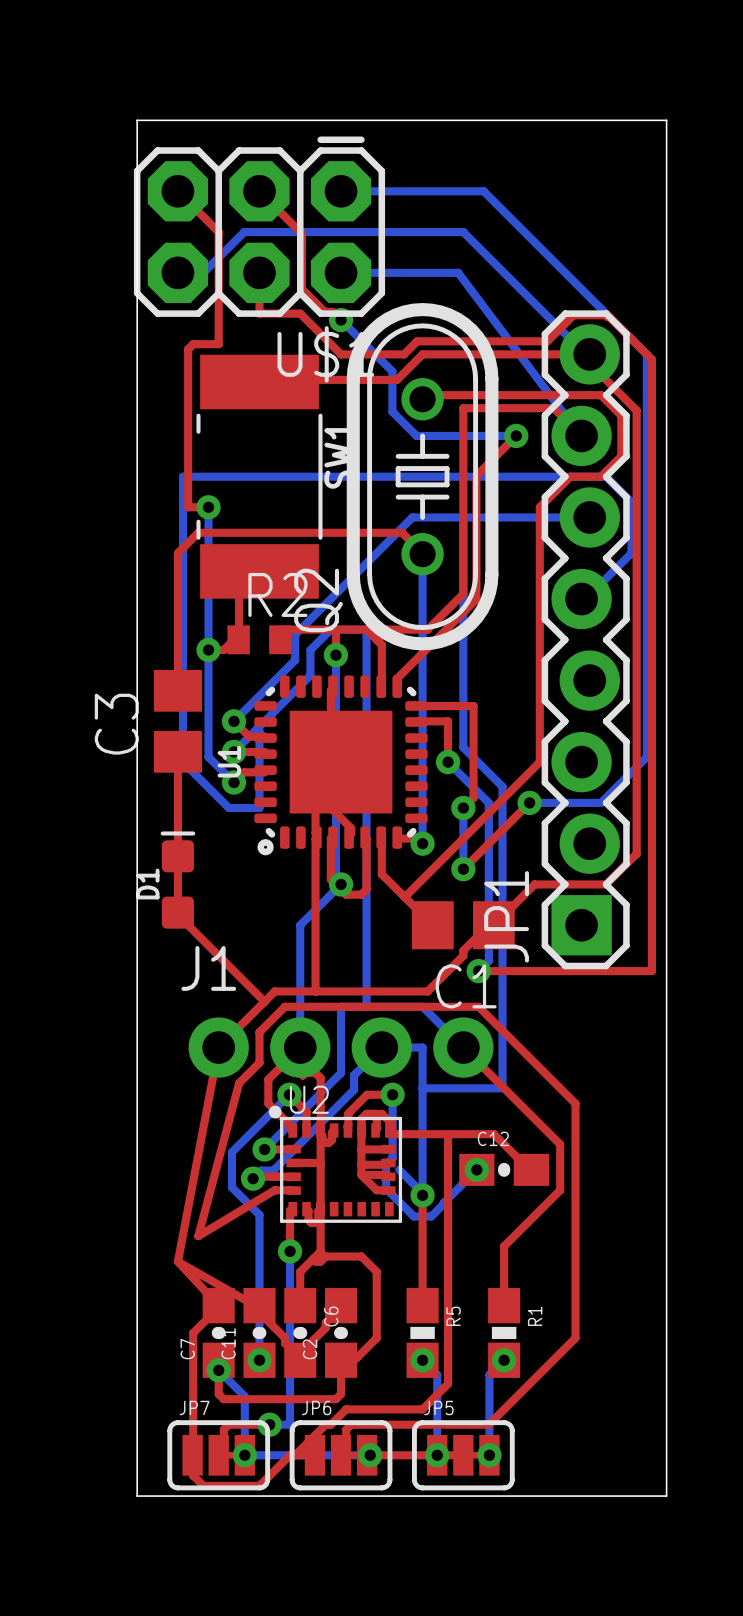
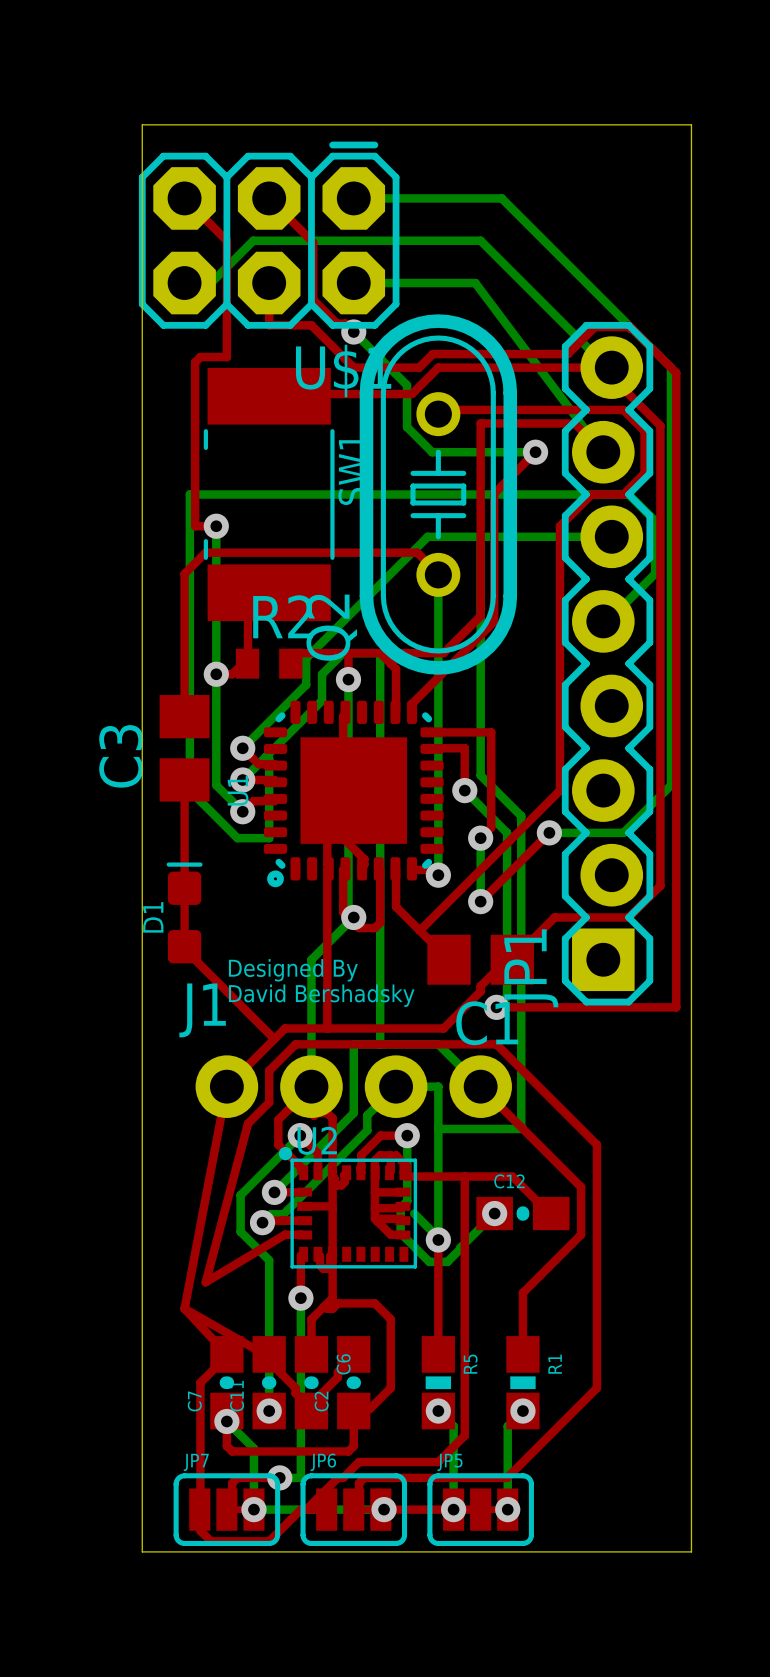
text: none -> Designed By (293, 970)
text: none -> David Bershadsky (321, 995)

